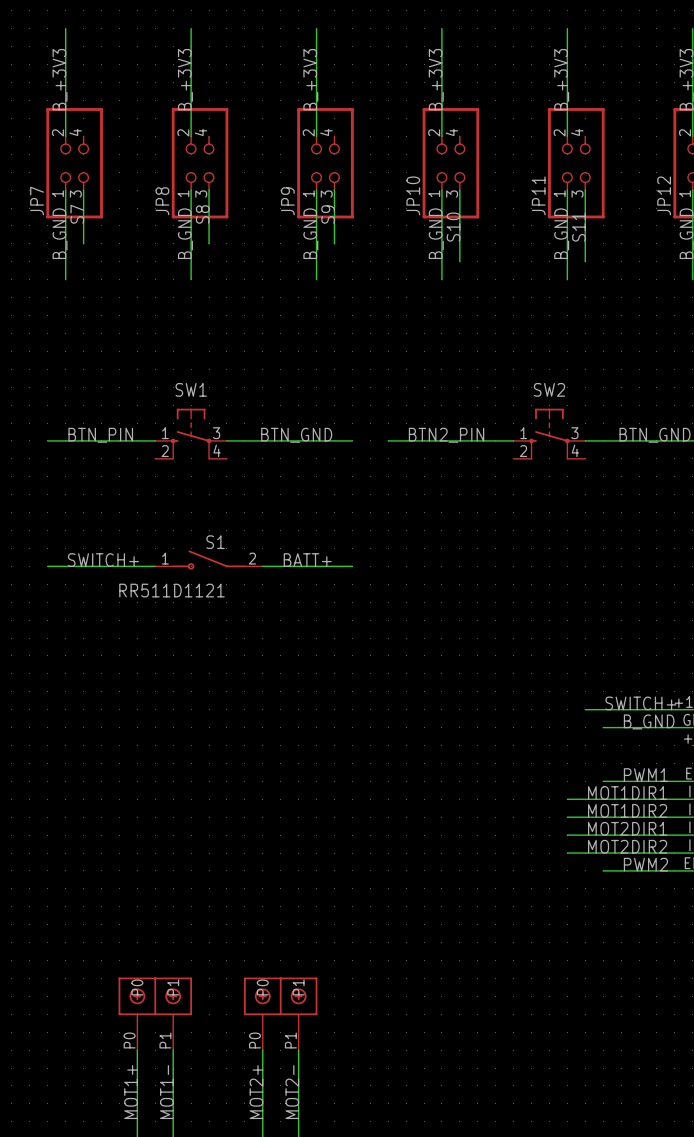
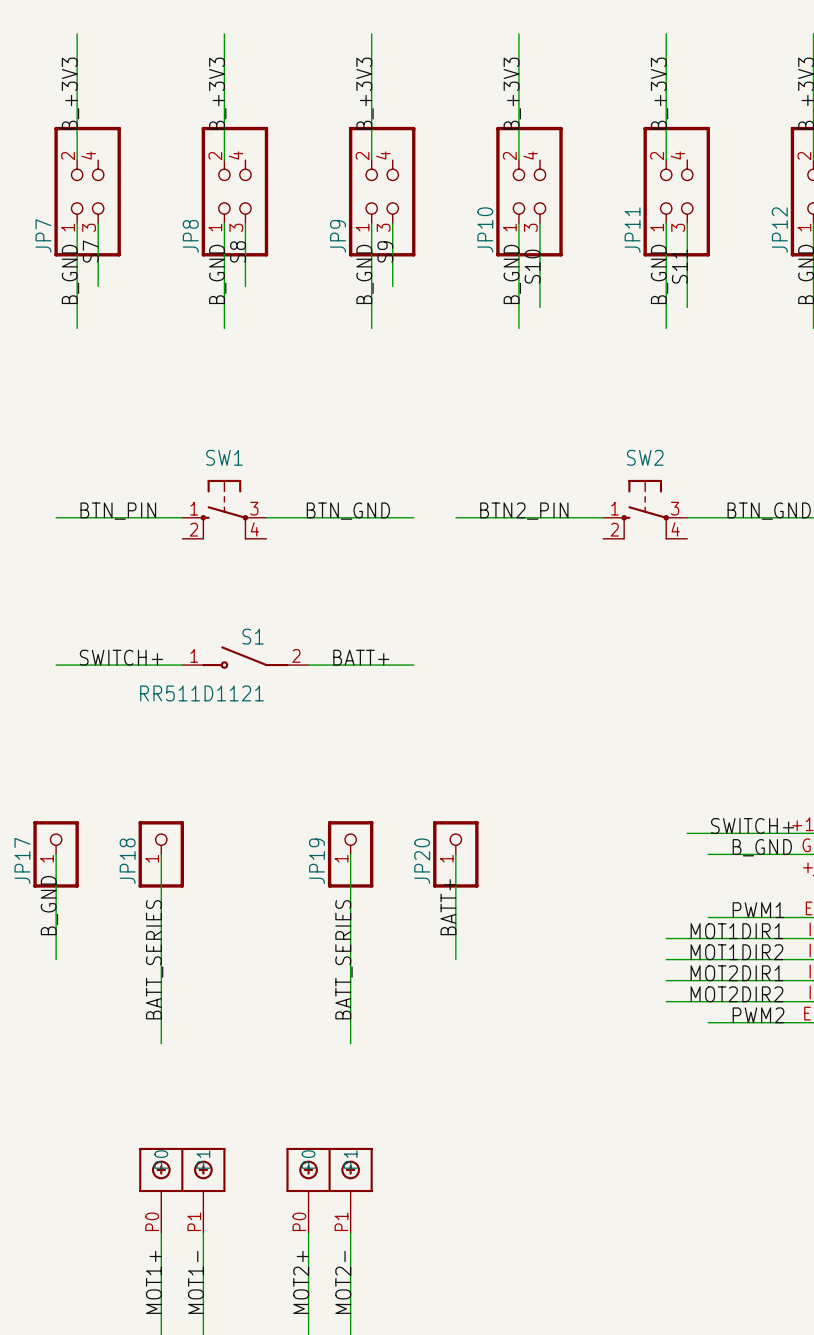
wire: none -> (56, 854) (56, 959)
JP17: none -> (56, 854)
wire: none -> (161, 854) (161, 1043)
JP18: none -> (161, 854)
wire: none -> (350, 854) (350, 1043)
JP19: none -> (350, 854)
wire: none -> (455, 854) (455, 959)
JP20: none -> (455, 854)
label: none -> B_GND (49, 905)
label: none -> BATT+ (448, 907)
label: none -> BATT_SERIES (154, 959)
label: none -> BATT_SERIES (343, 959)

